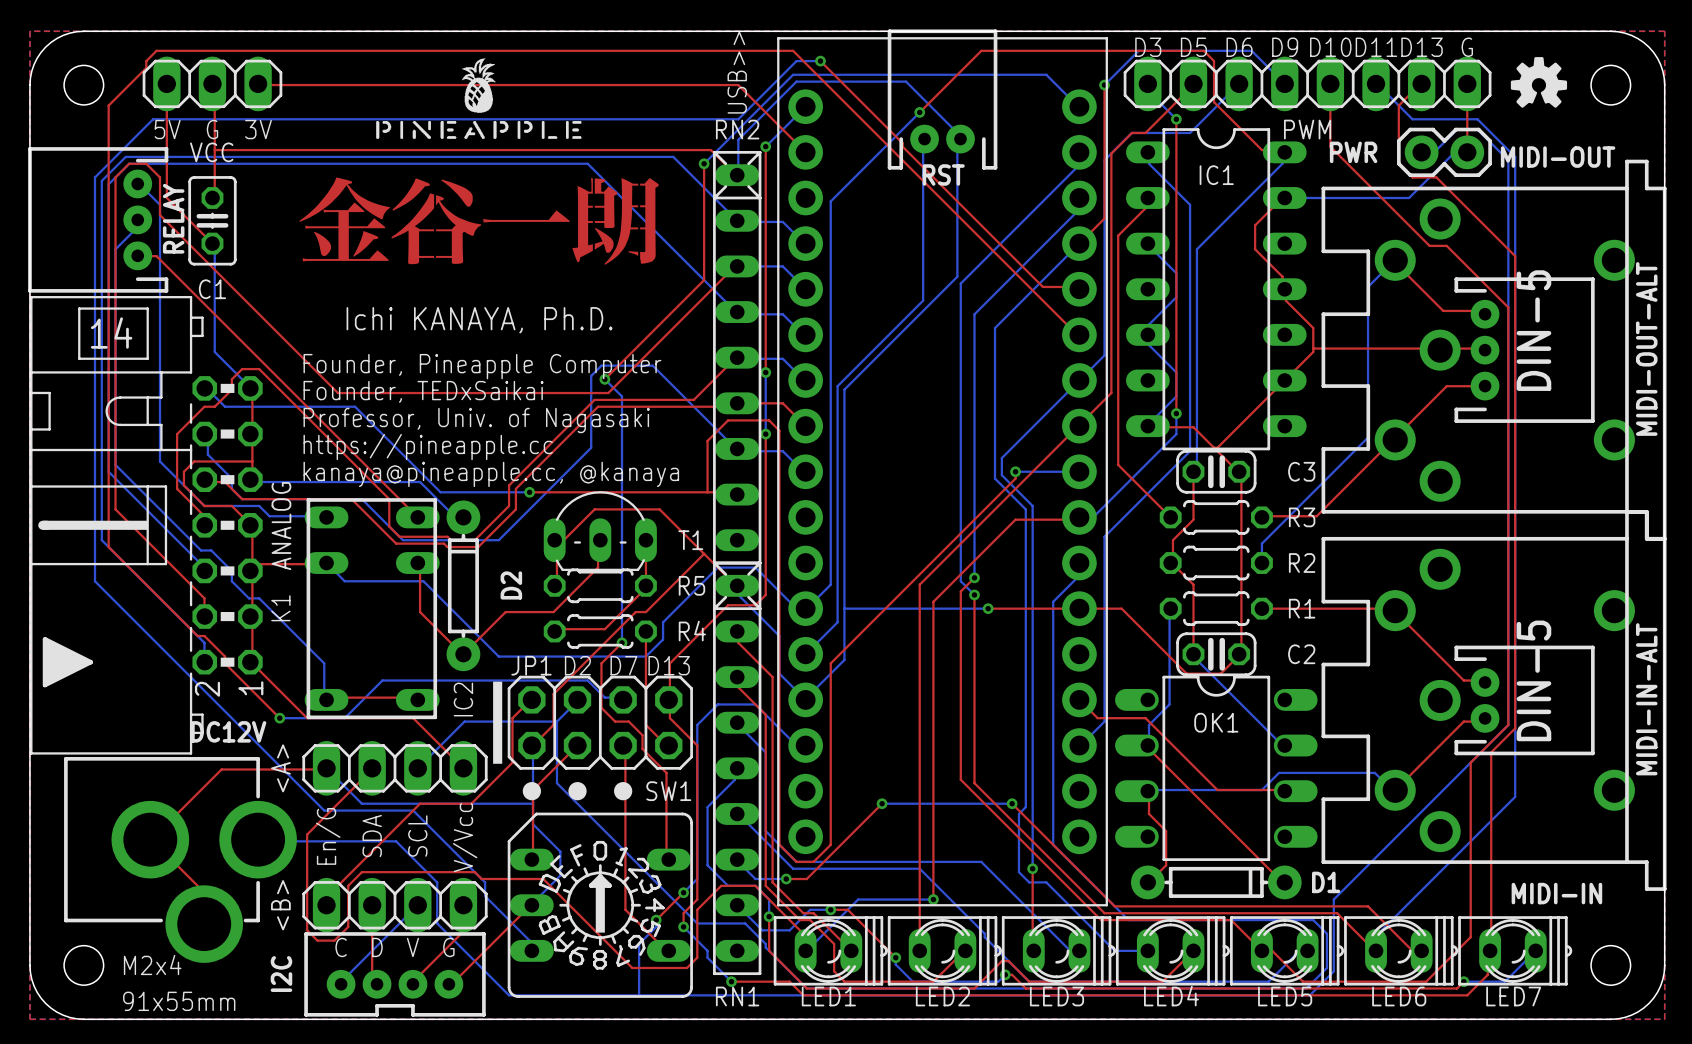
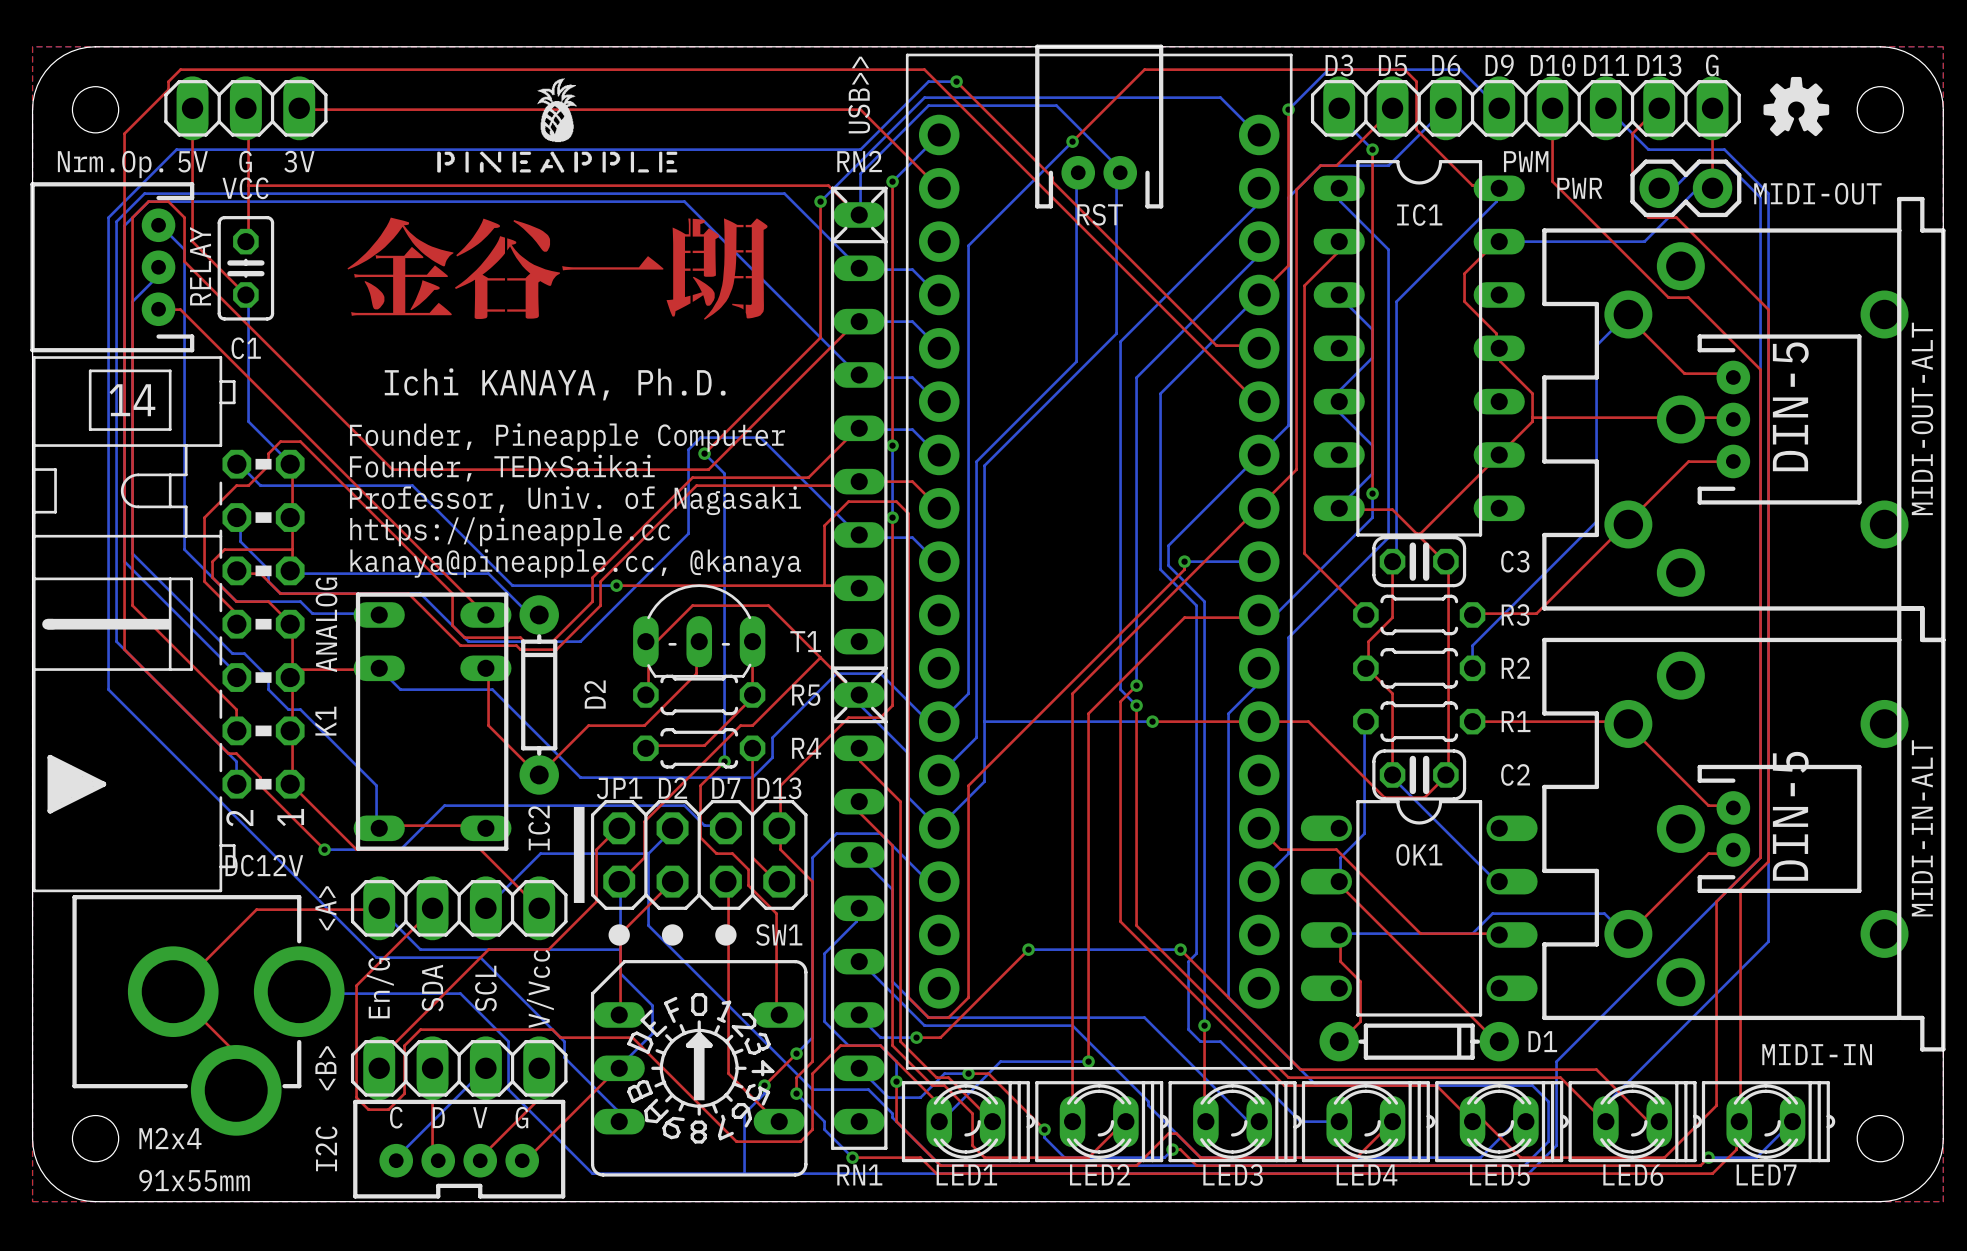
text: none -> Nrm.Op. (110, 164)

